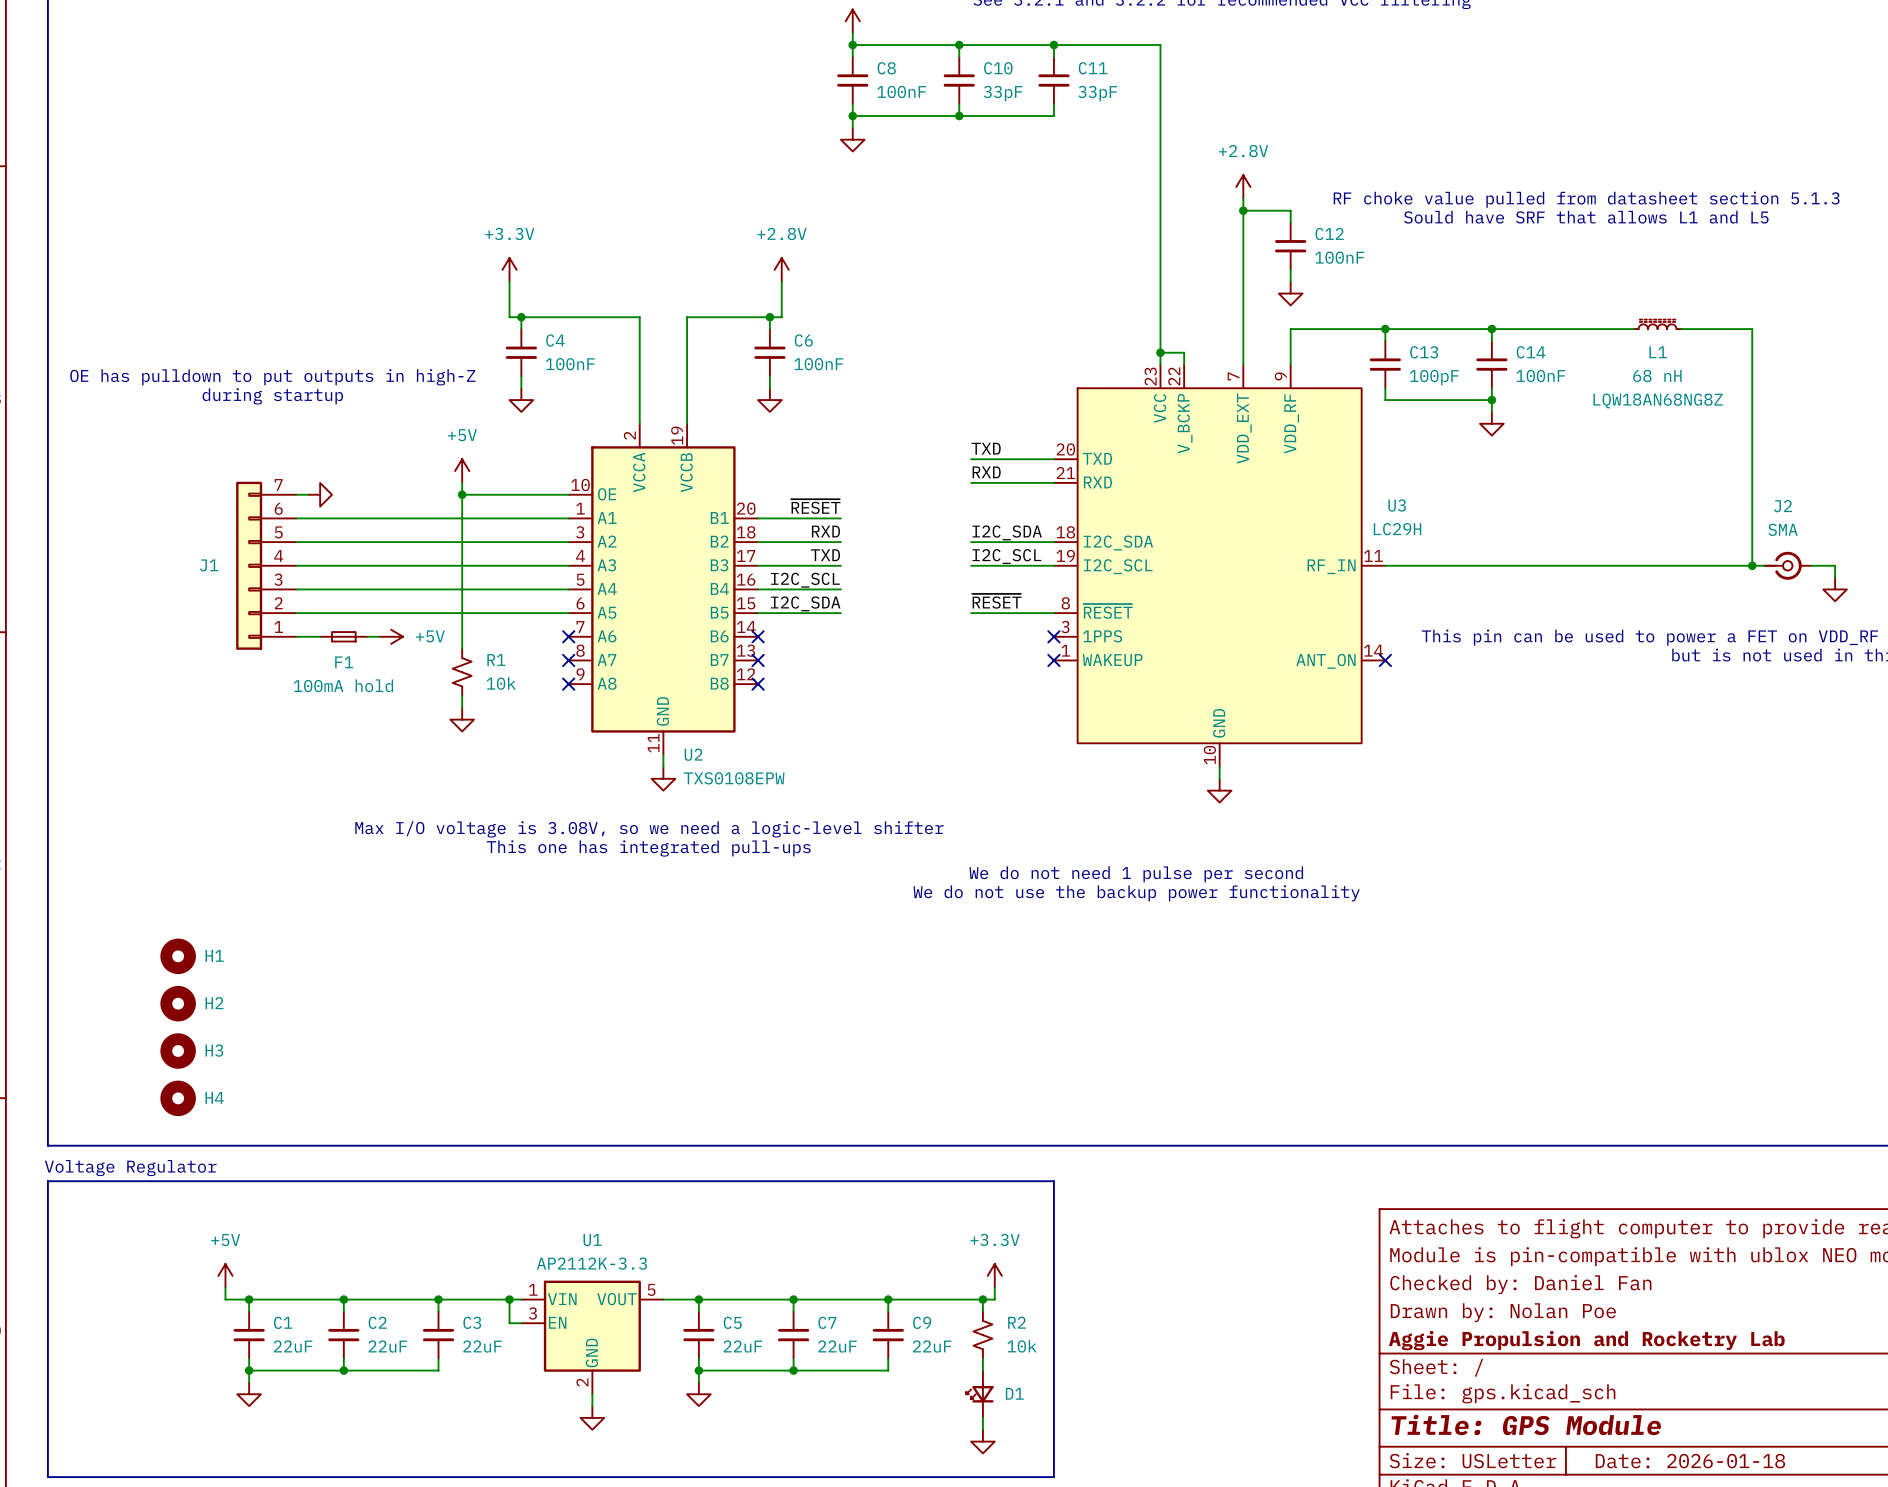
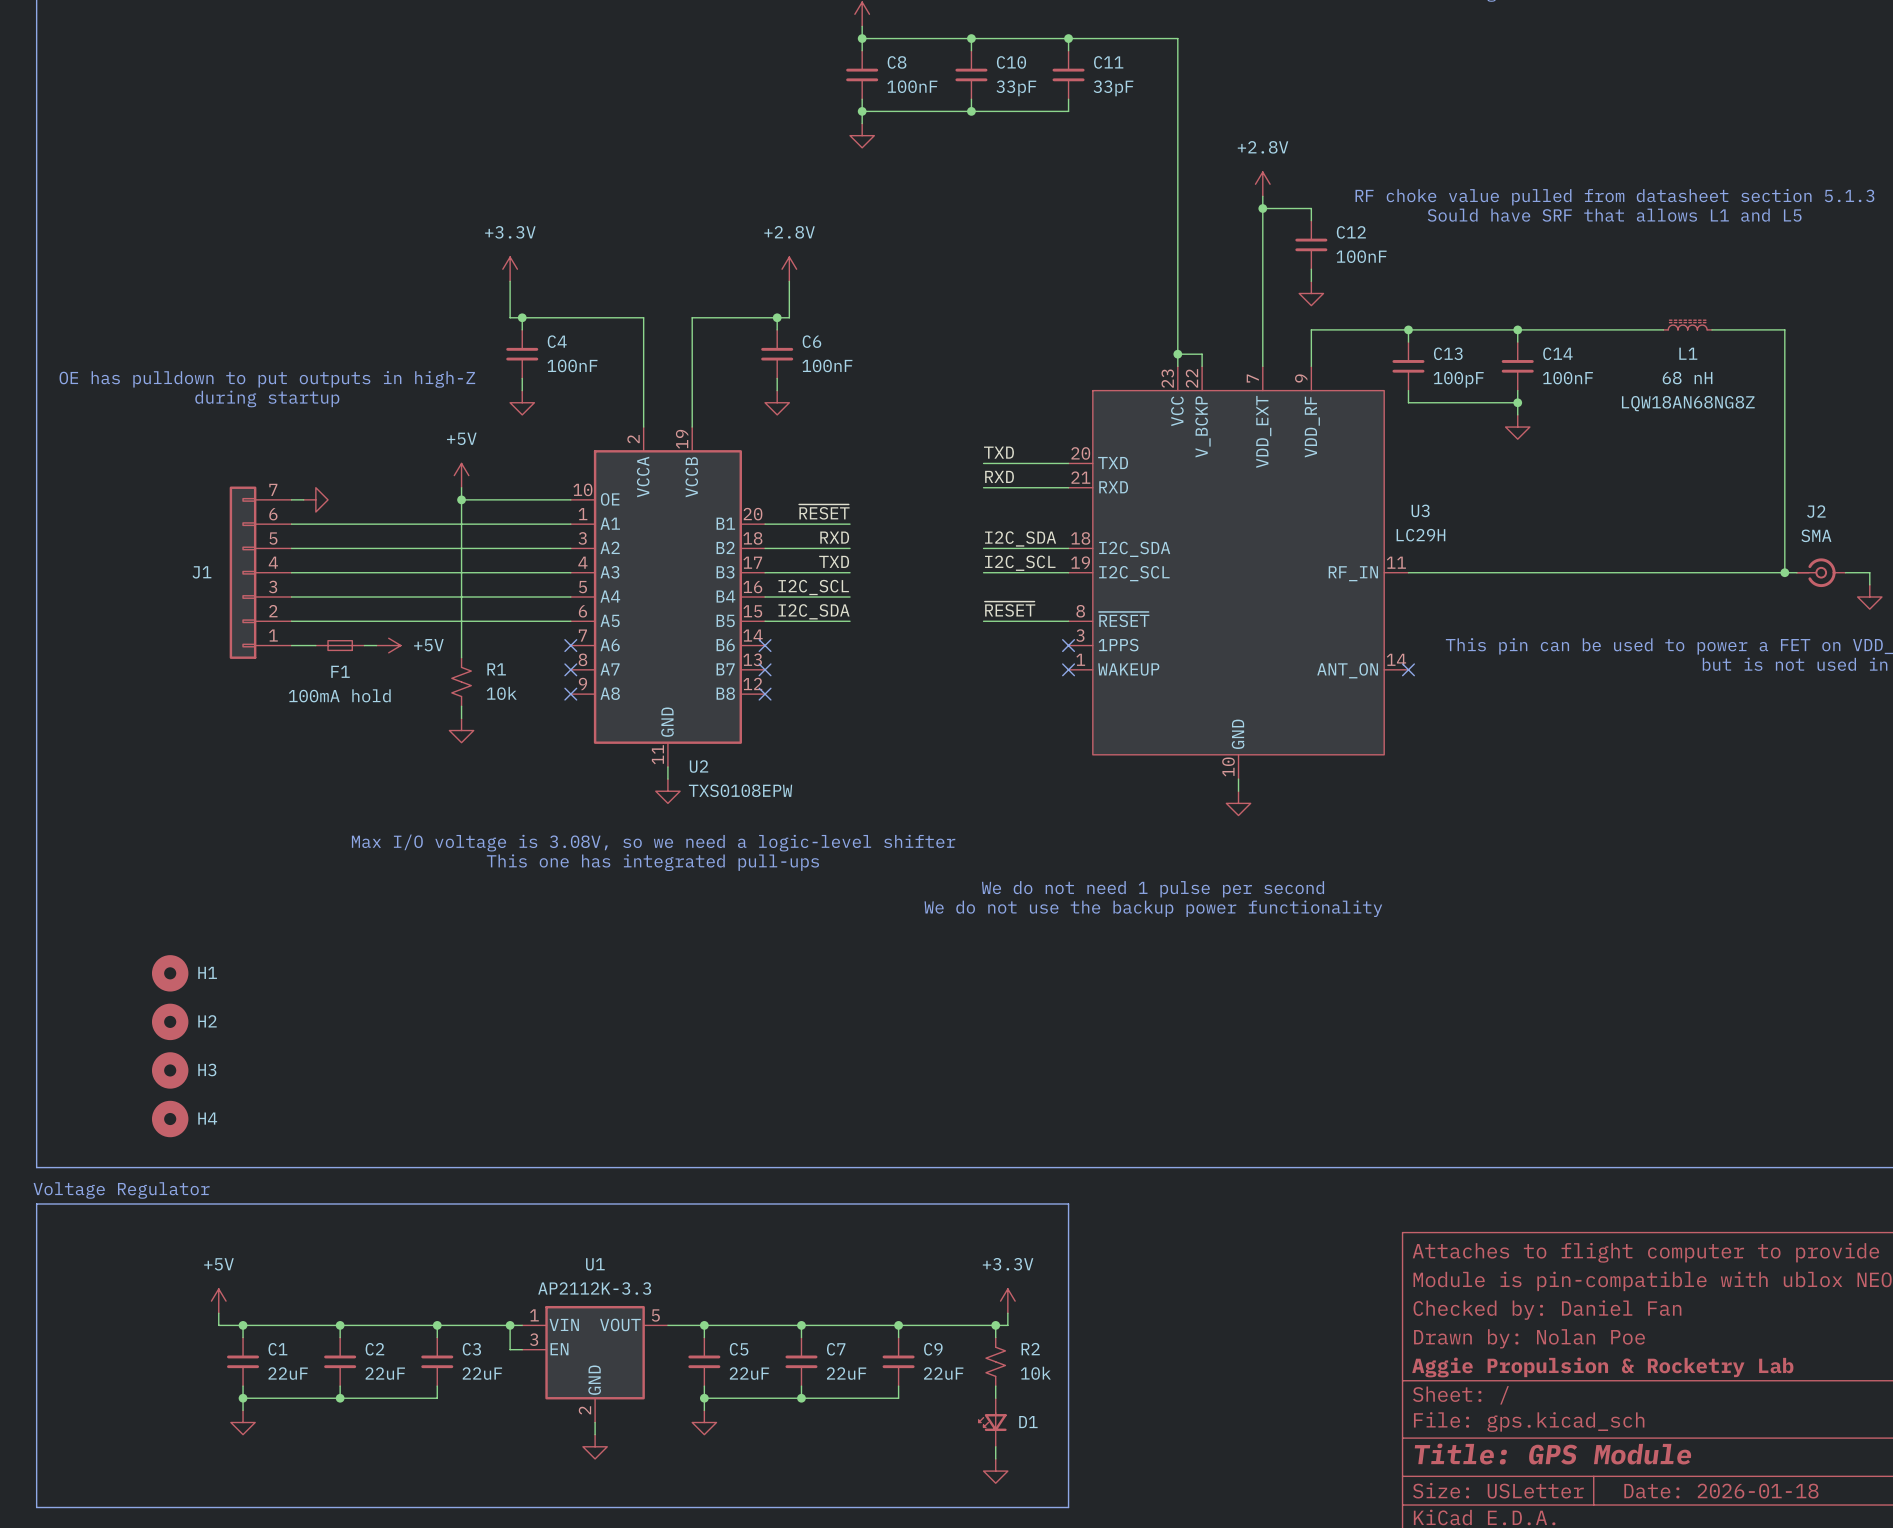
title block: Aggie Propulsion and Rocketry Lab (1586, 1340) -> Aggie Propulsion & Rocketry Lab (1602, 1367)

